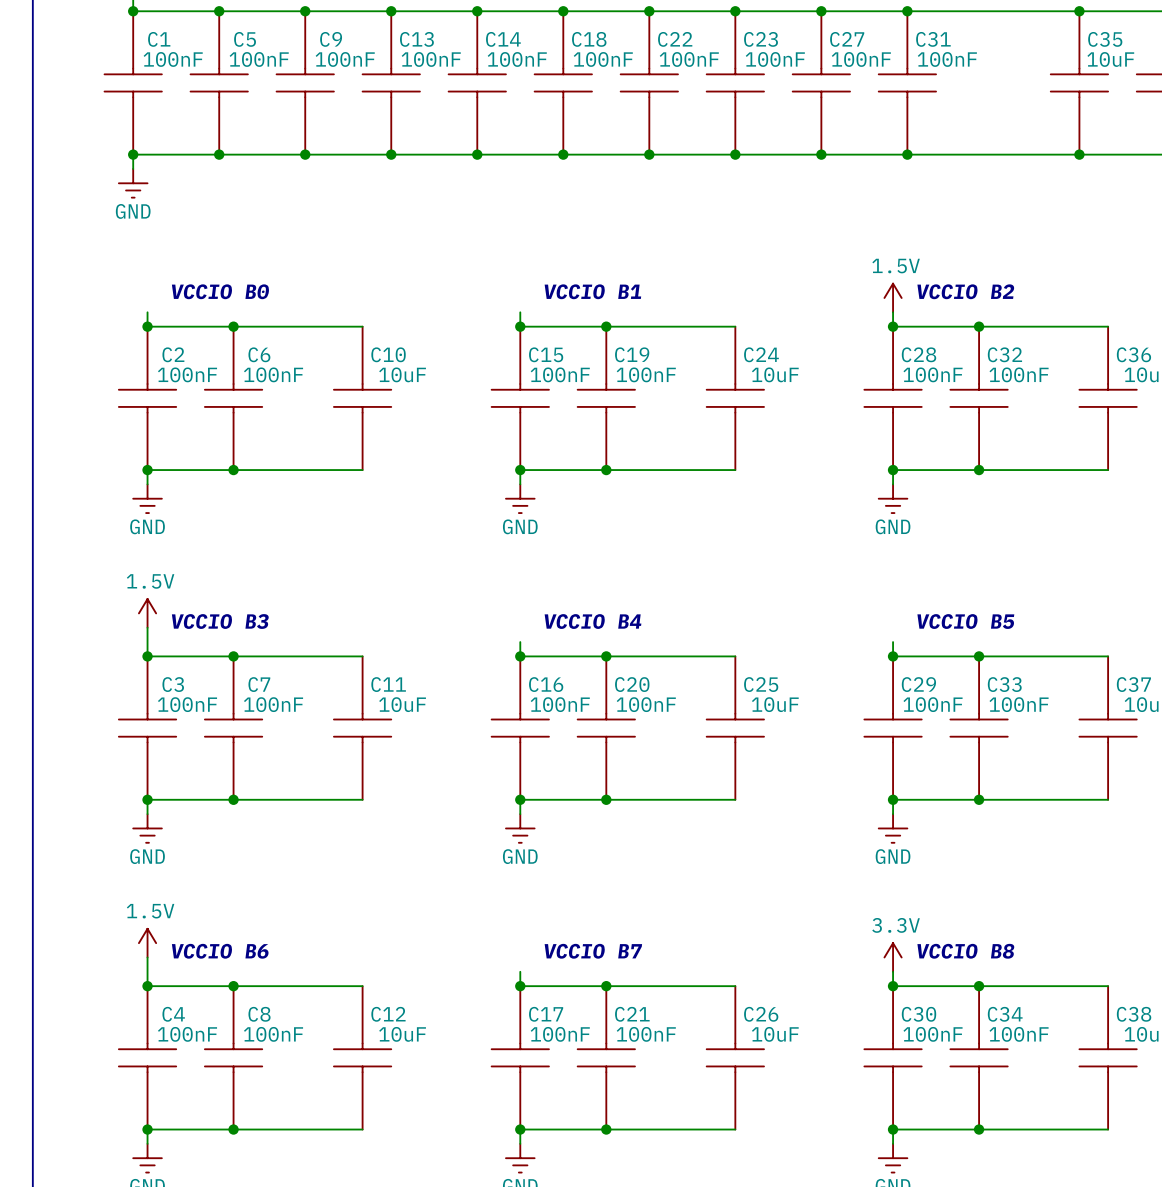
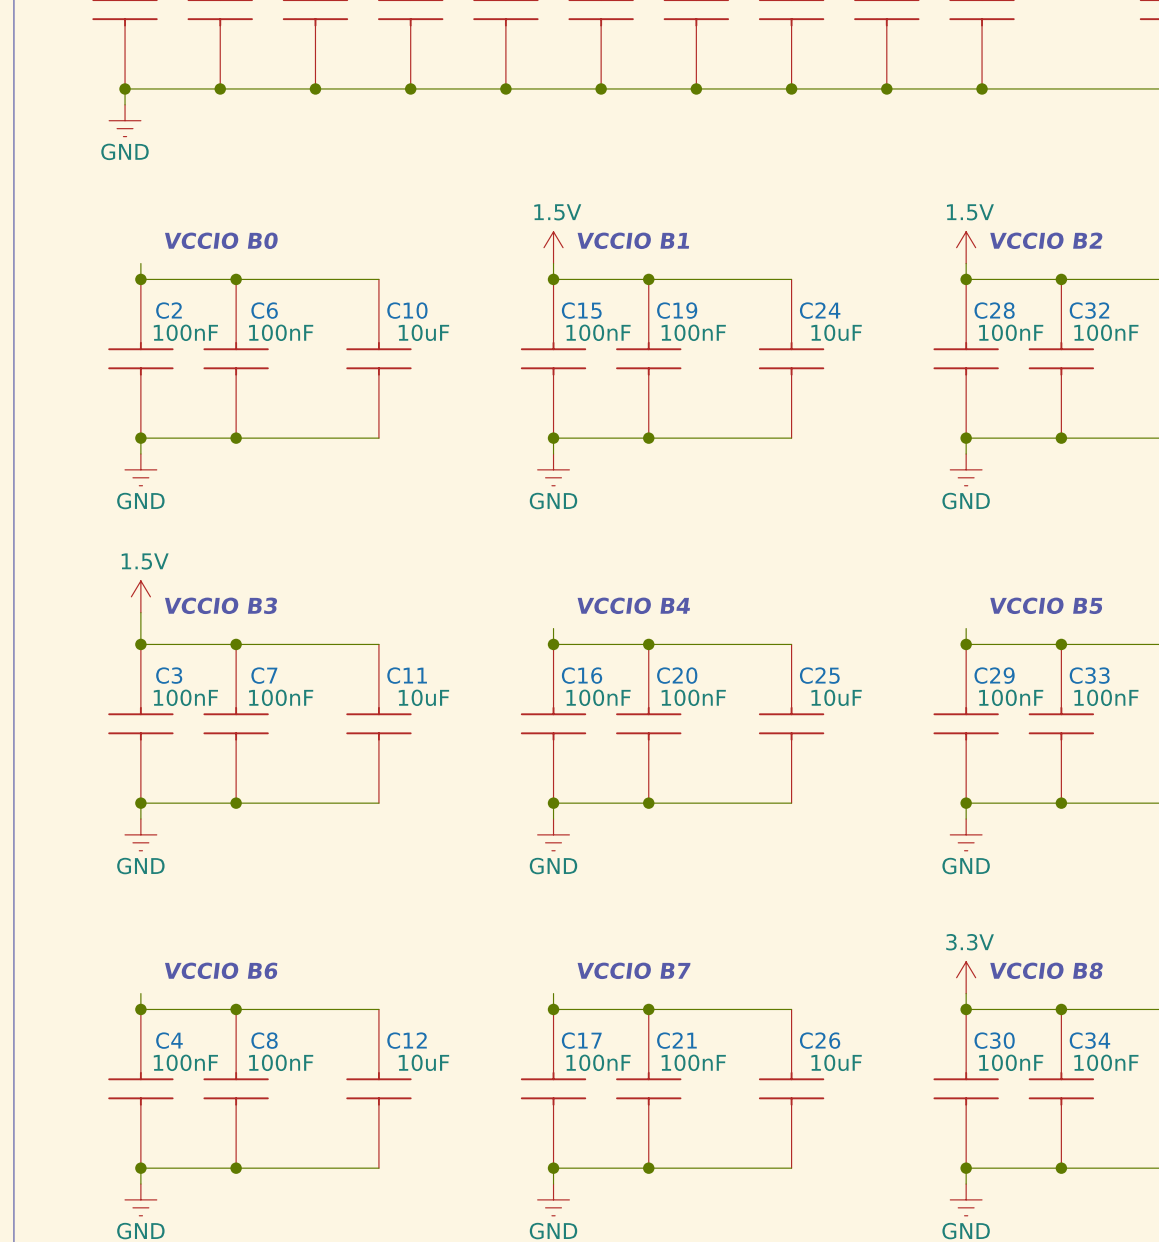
power symbol: none -> 1.5V (553, 247)
power symbol: 1.5V (147, 943) -> none
wire: (147, 957) (147, 971) -> none

